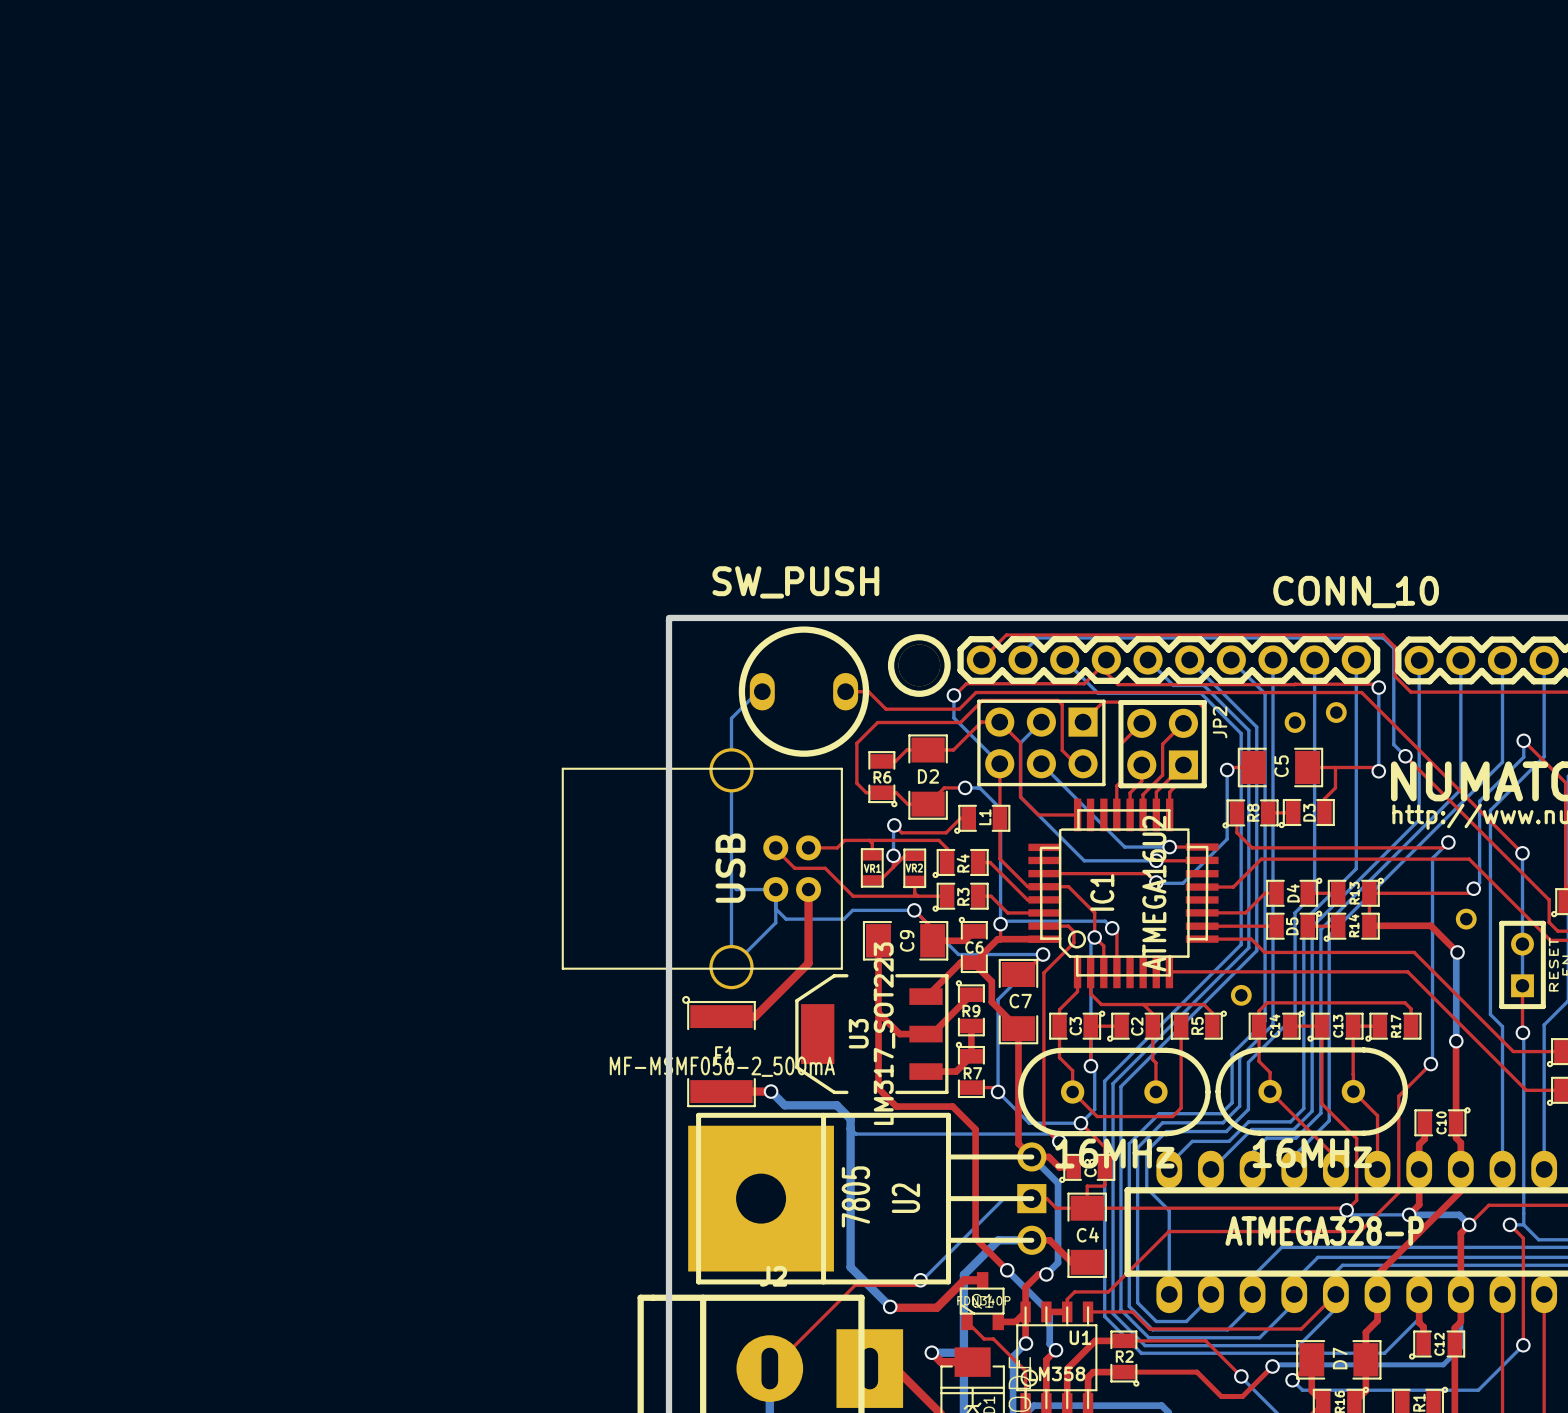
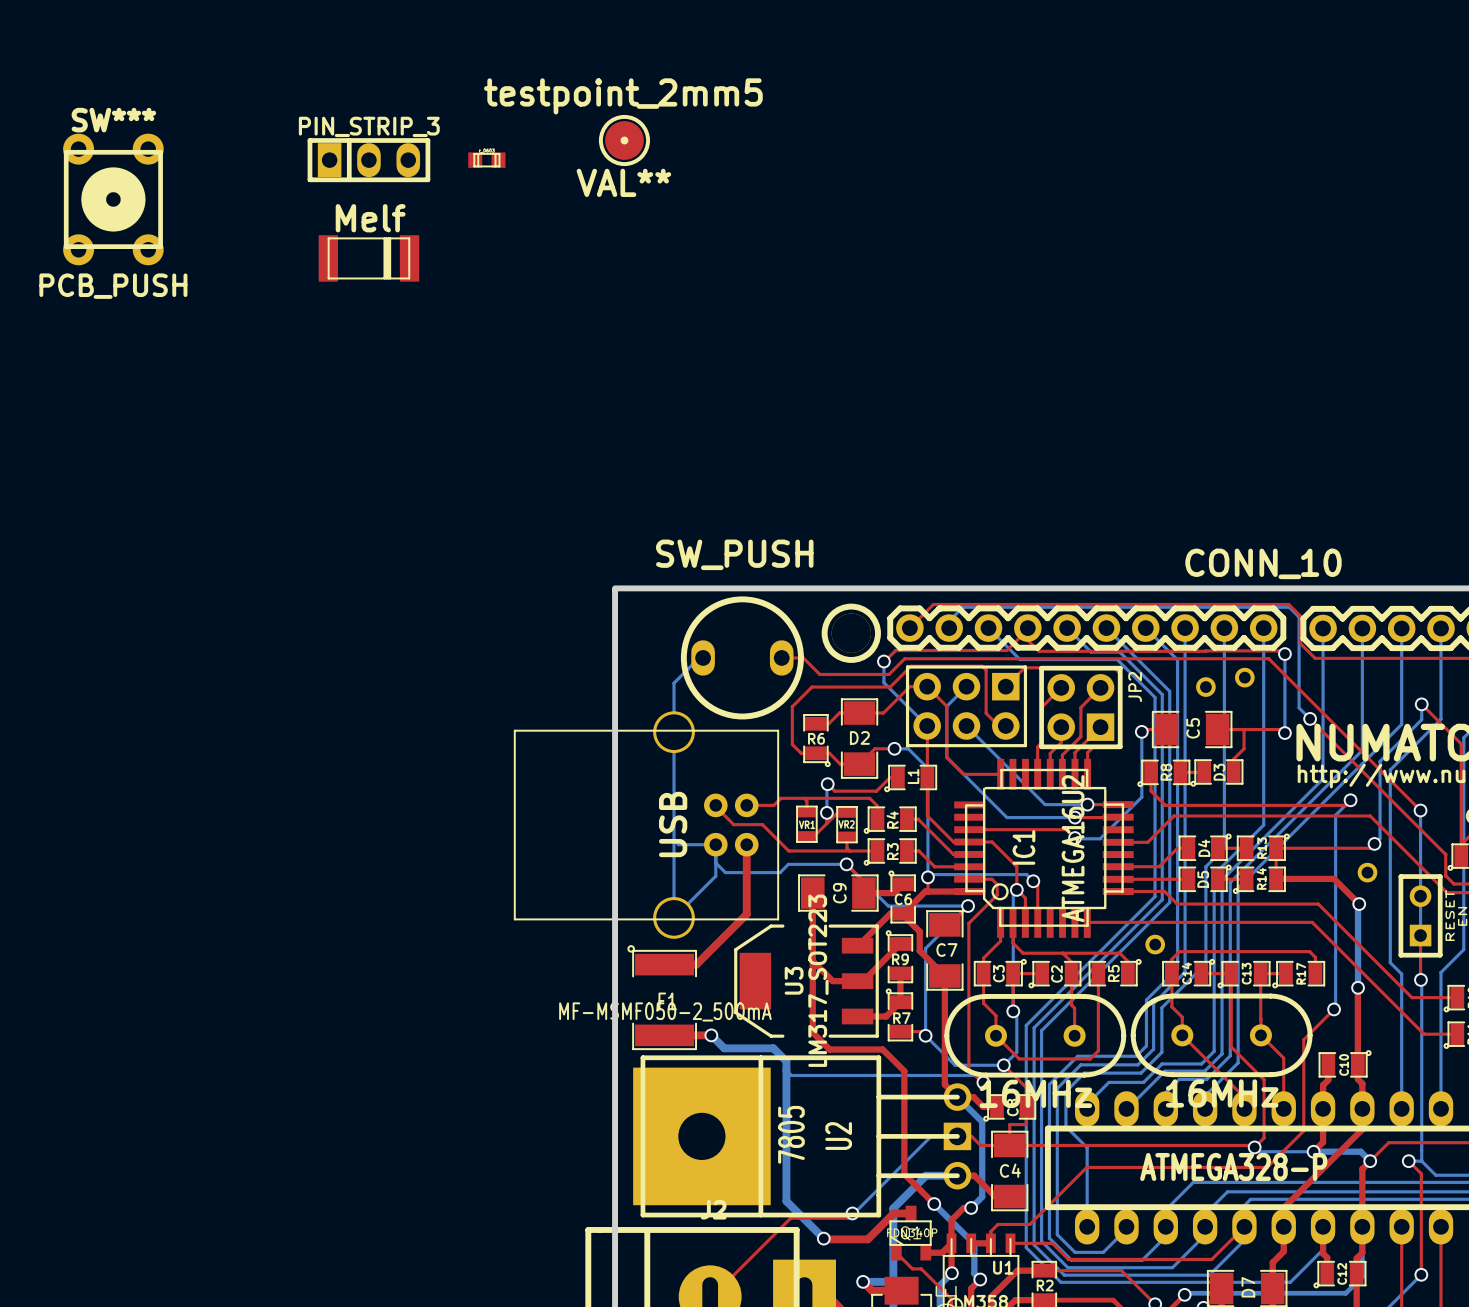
testpoint_2mm5: none -> VAL** (624, 140)
PIN_STRIP_3: none -> (368, 160)
part: none -> (486, 160)
SW***: none -> PCB_PUSH (113, 199)
Melf: none -> (368, 258)

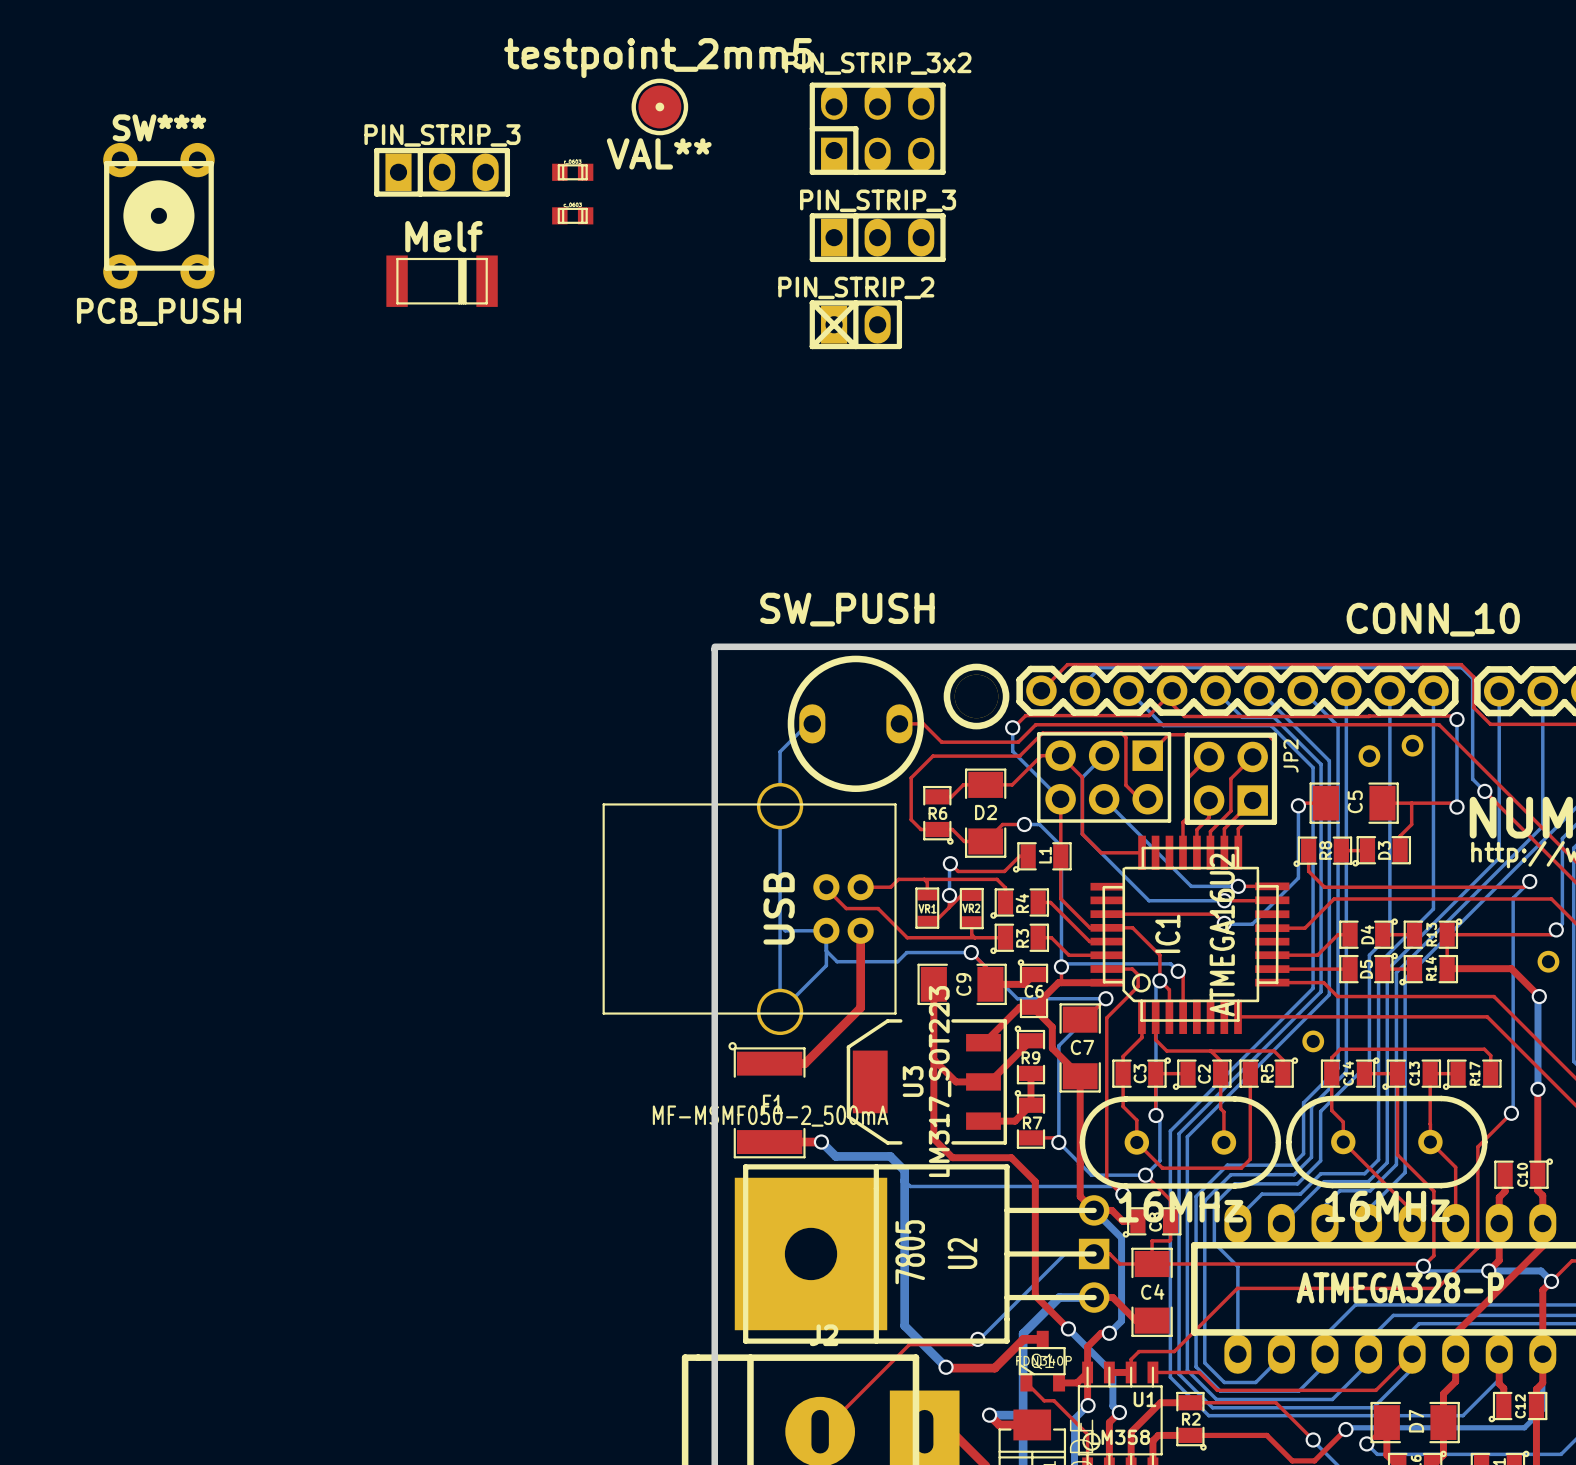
PIN_STRIP_3x2: none -> (877, 128)
testpoint_2mm5 position: (624, 140) -> (659, 106)
part: none -> (572, 215)
PIN_STRIP_3: none -> (877, 237)
PIN_STRIP_2: none -> (855, 324)

